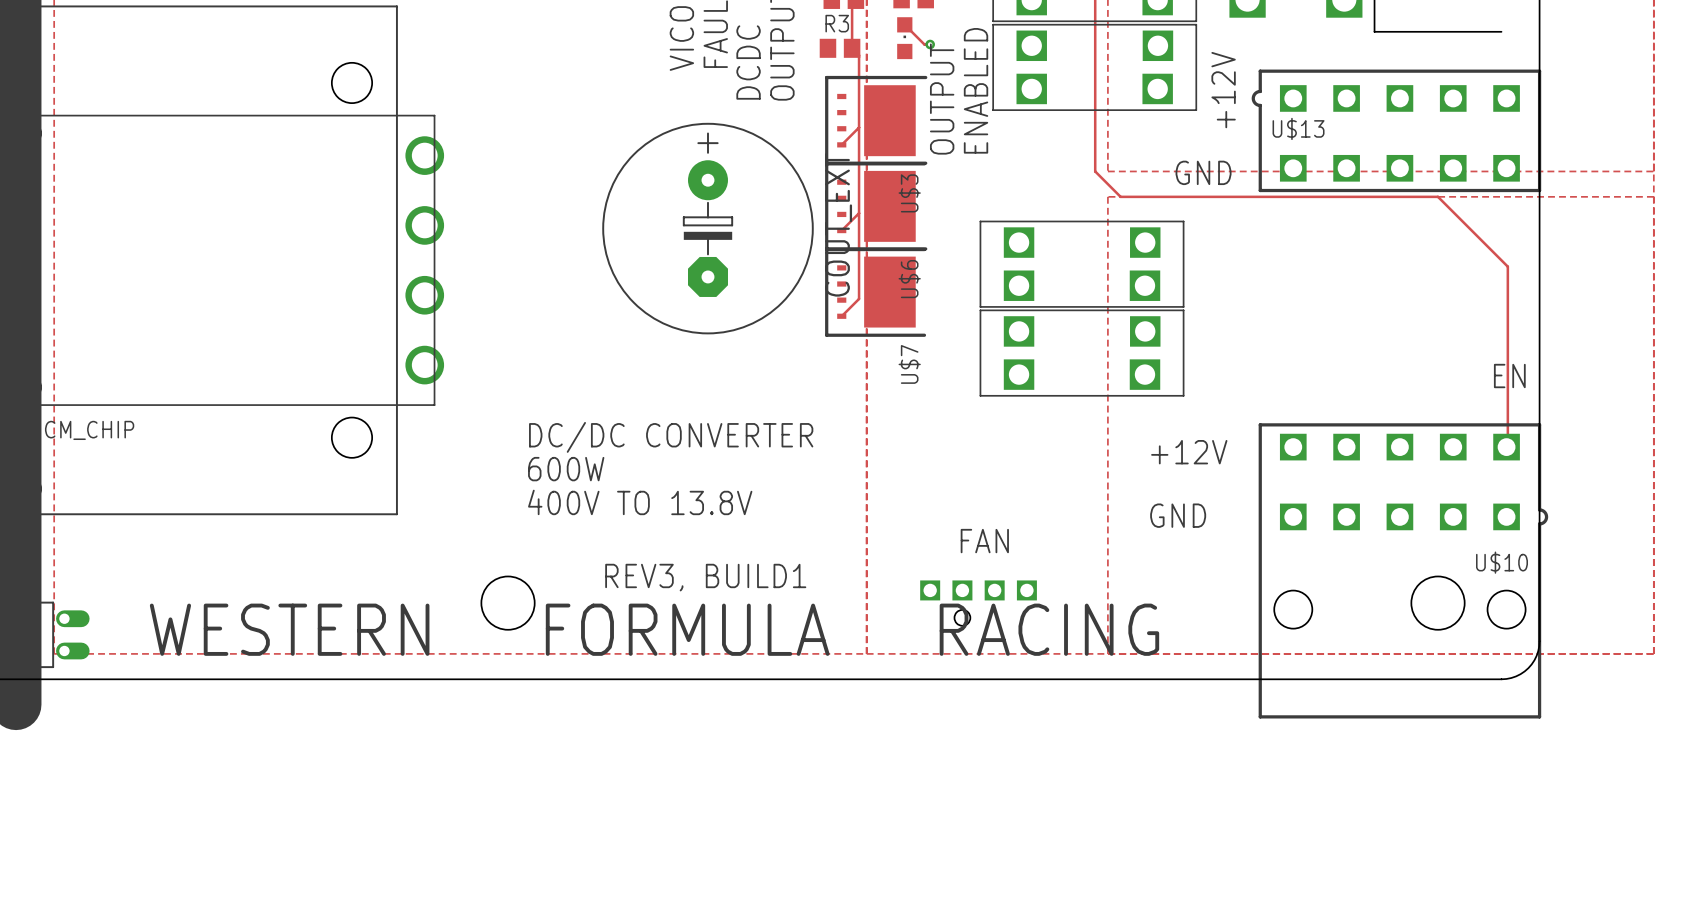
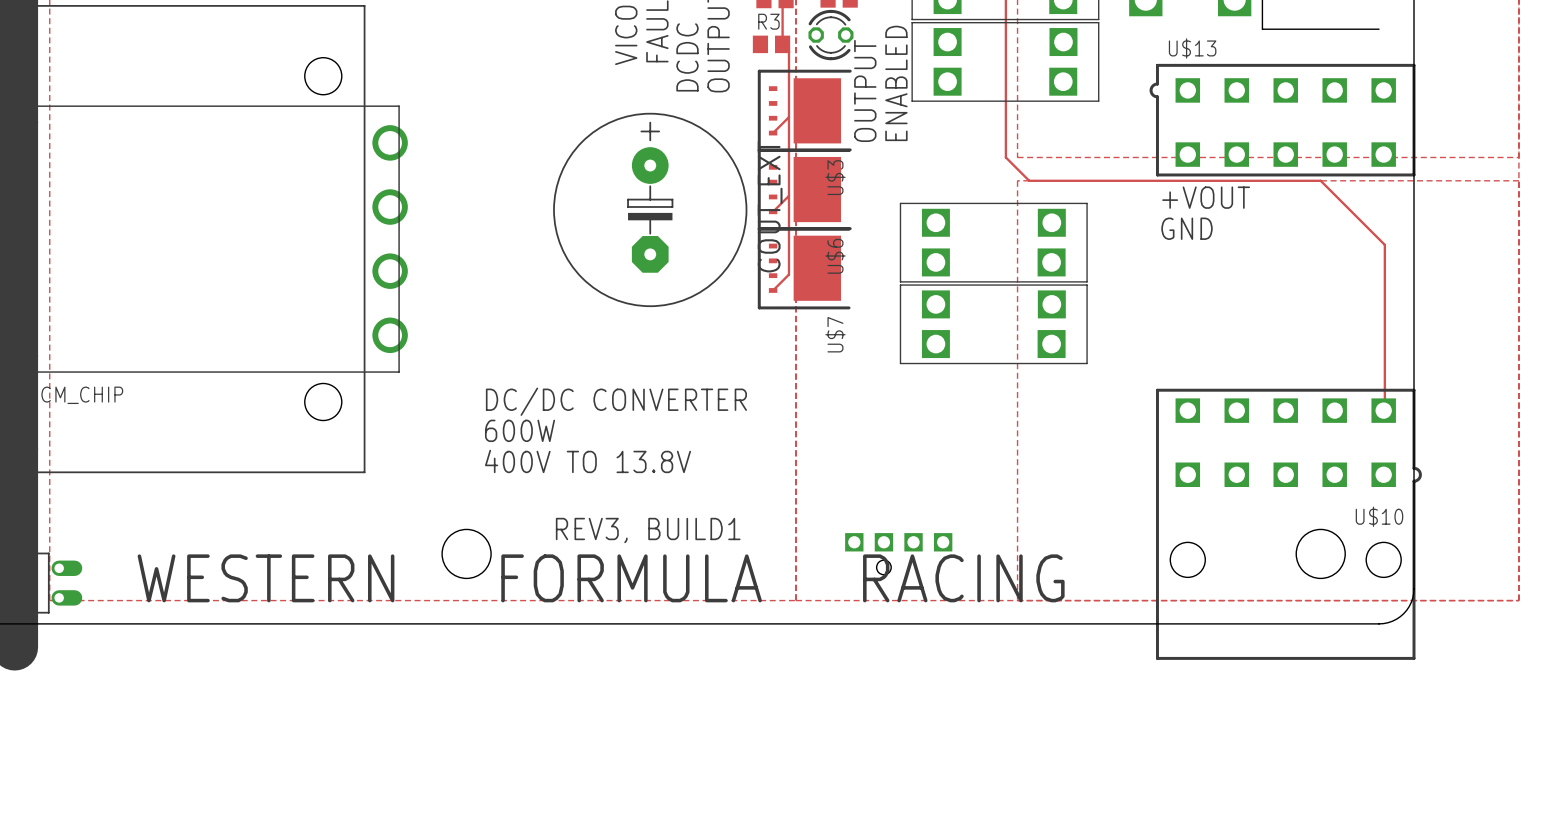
part footprint: [897, 17, 913, 60] -> [808, 9, 854, 61]
track: (904, 24) (924, 44) (930, 44) -> none
via: (930, 44) -> none
text: +12V (1223, 90) -> none
U$13 name position: U$13 (1298, 128) -> U$13 (1192, 48)
text position: GND (1203, 172) -> GND (1187, 228)
text: none -> +VOUT (1206, 197)
text: EN (1509, 376) -> none
text: +12V (1189, 452) -> none
text: GND (1178, 515) -> none
text: FAN (984, 541) -> none

